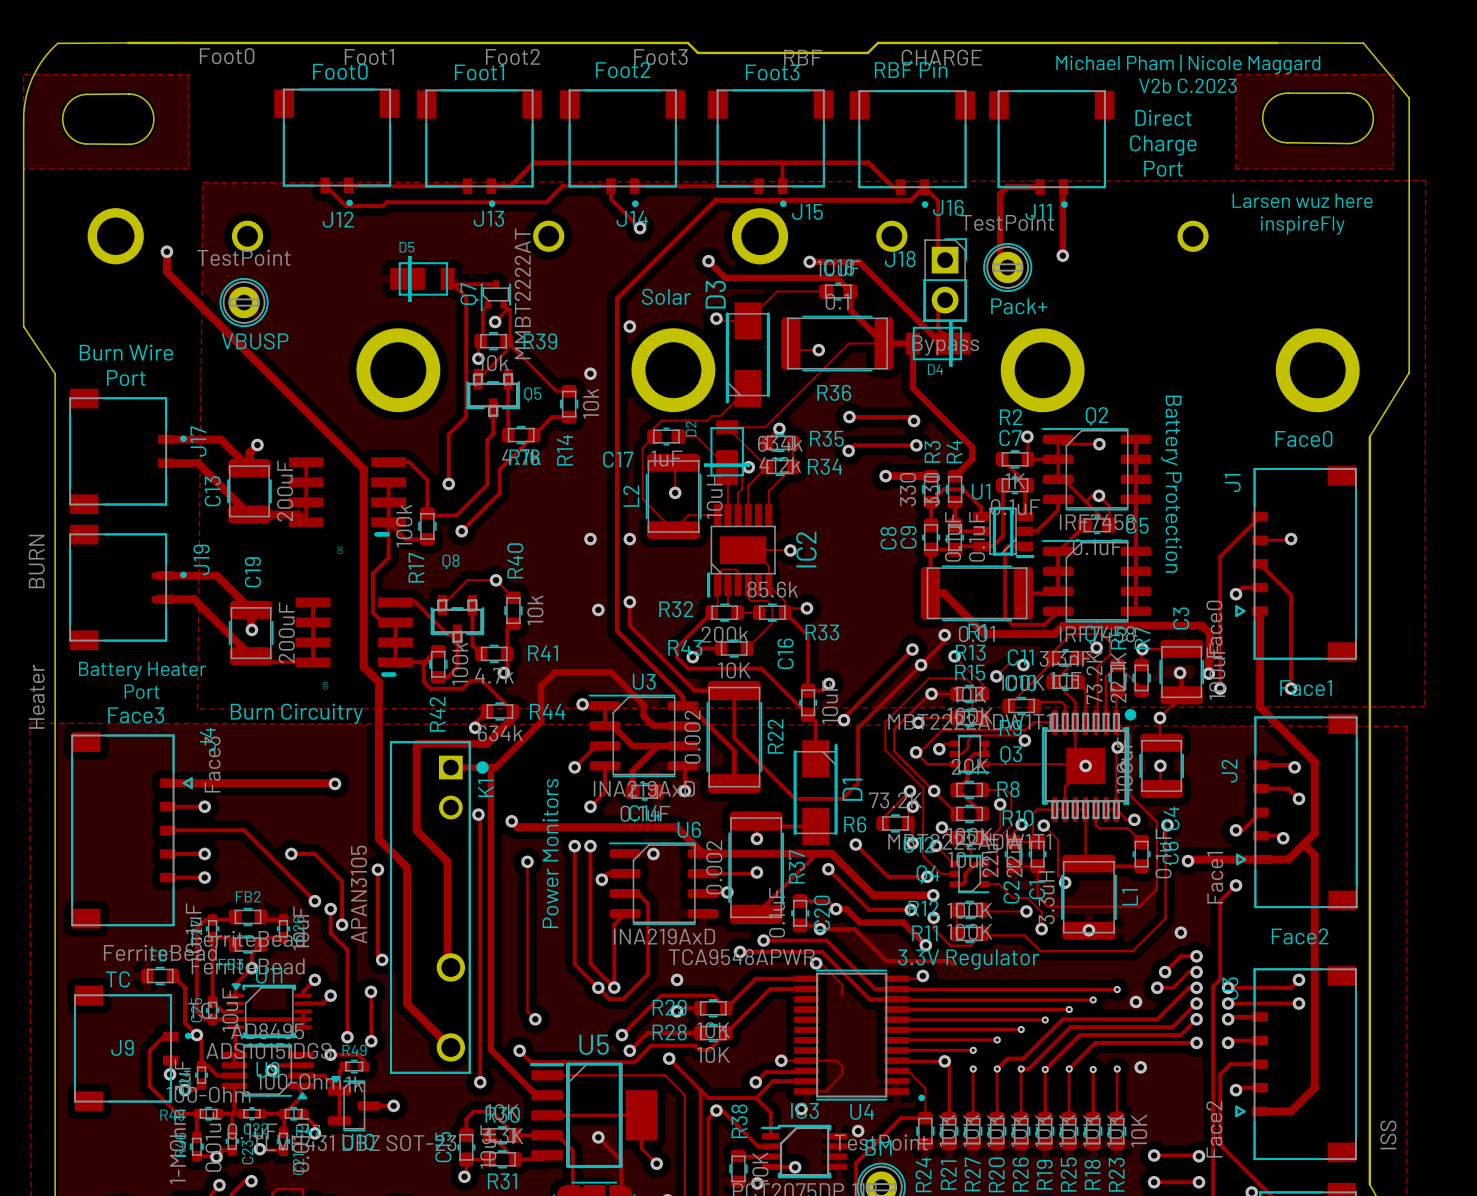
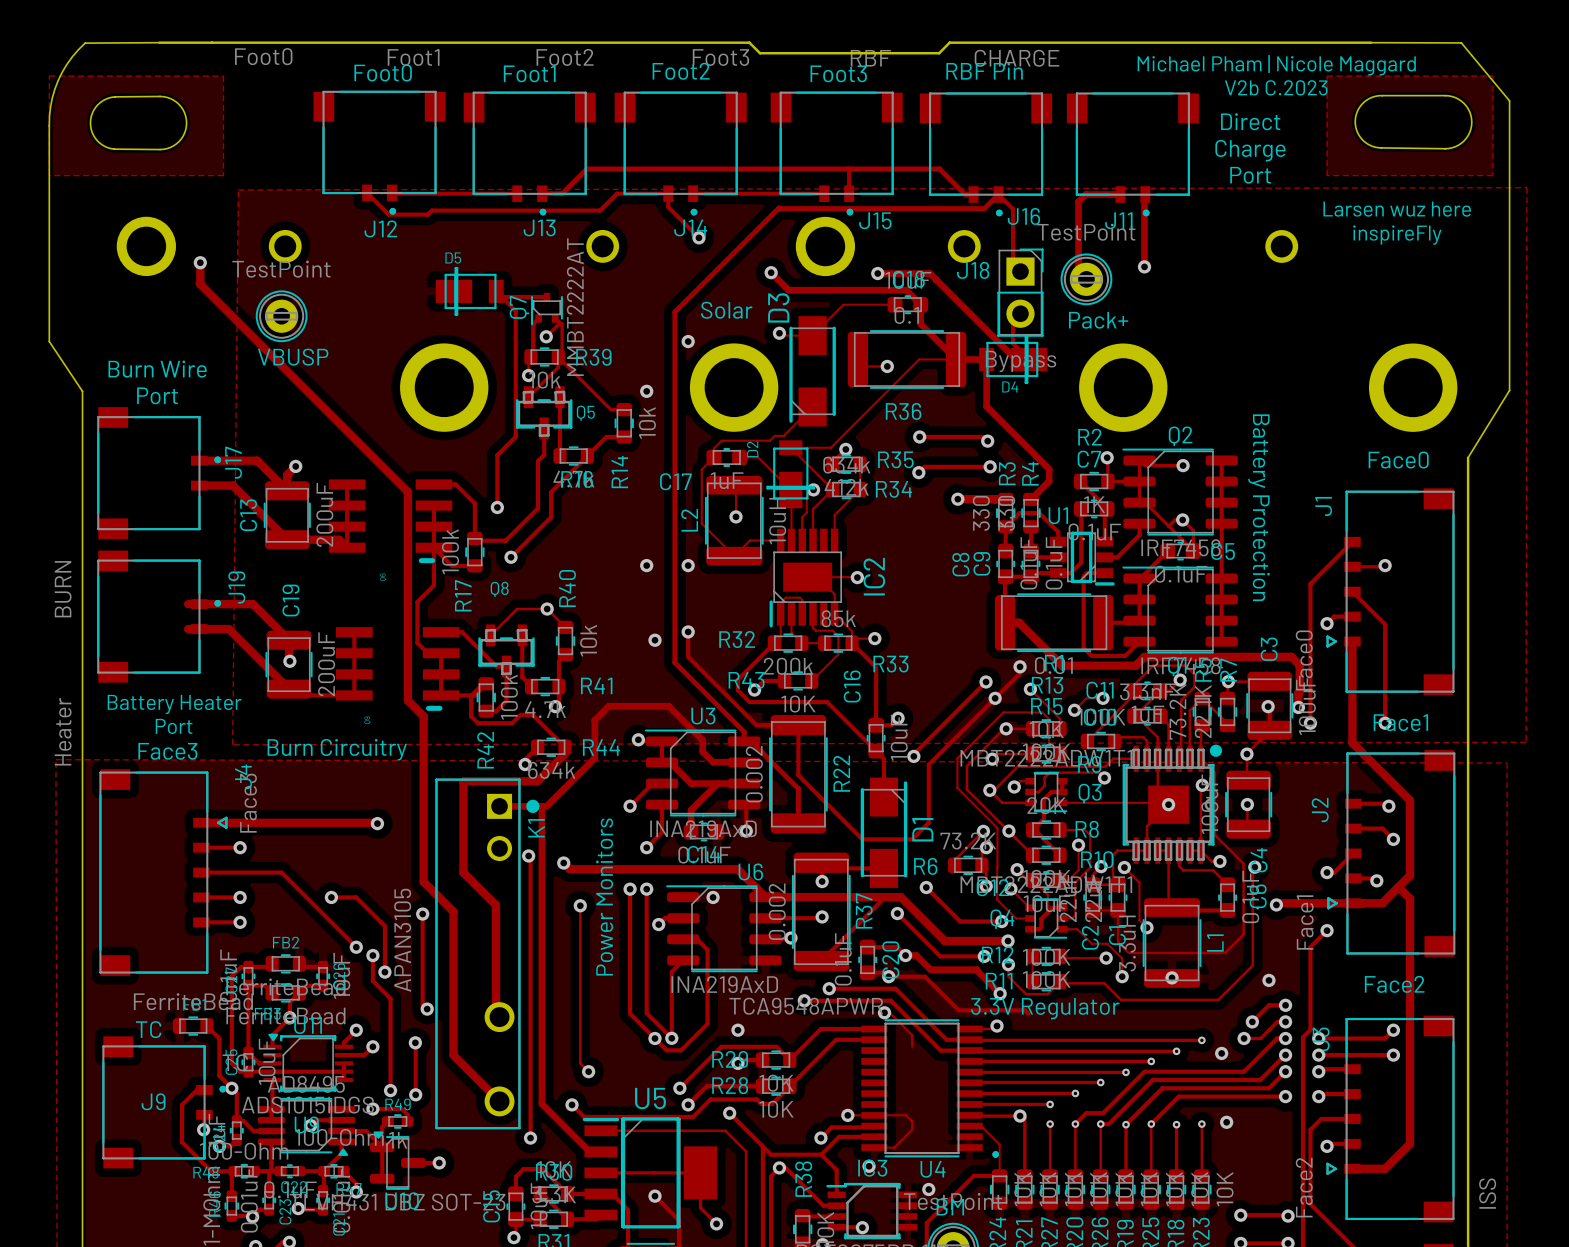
R33 value: 85.6k (772, 589) -> 85k (838, 618)

